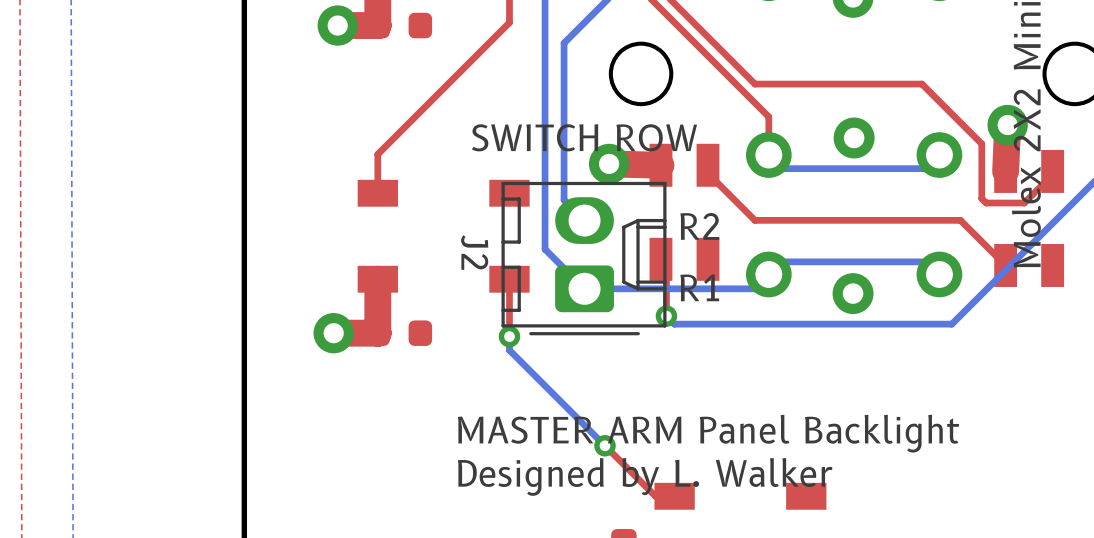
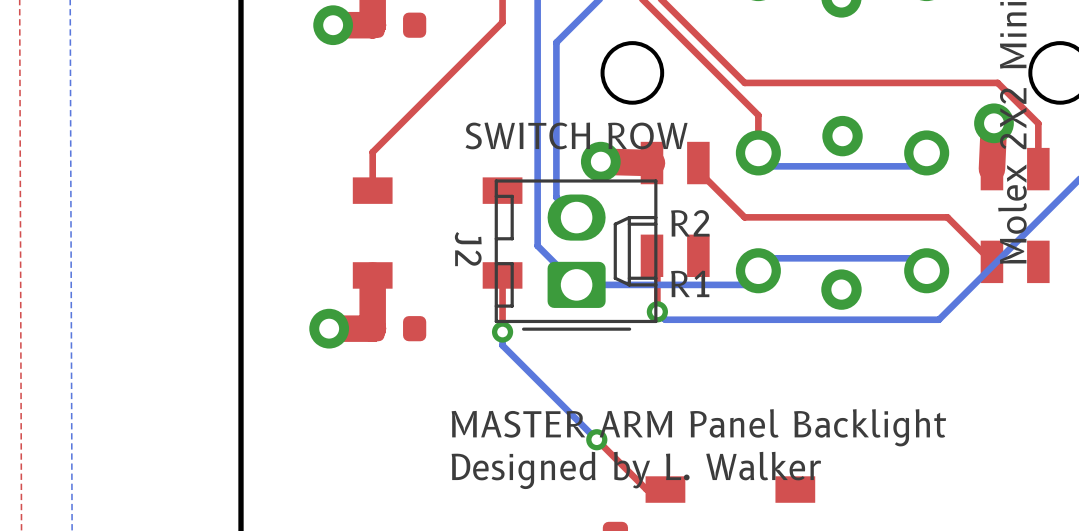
top track: (921, 84) (981, 143) (981, 198) (986, 203) (1024, 203) (1052, 174) (1052, 171) -> (909, 82) (997, 82) (1038, 123) (1038, 169)

